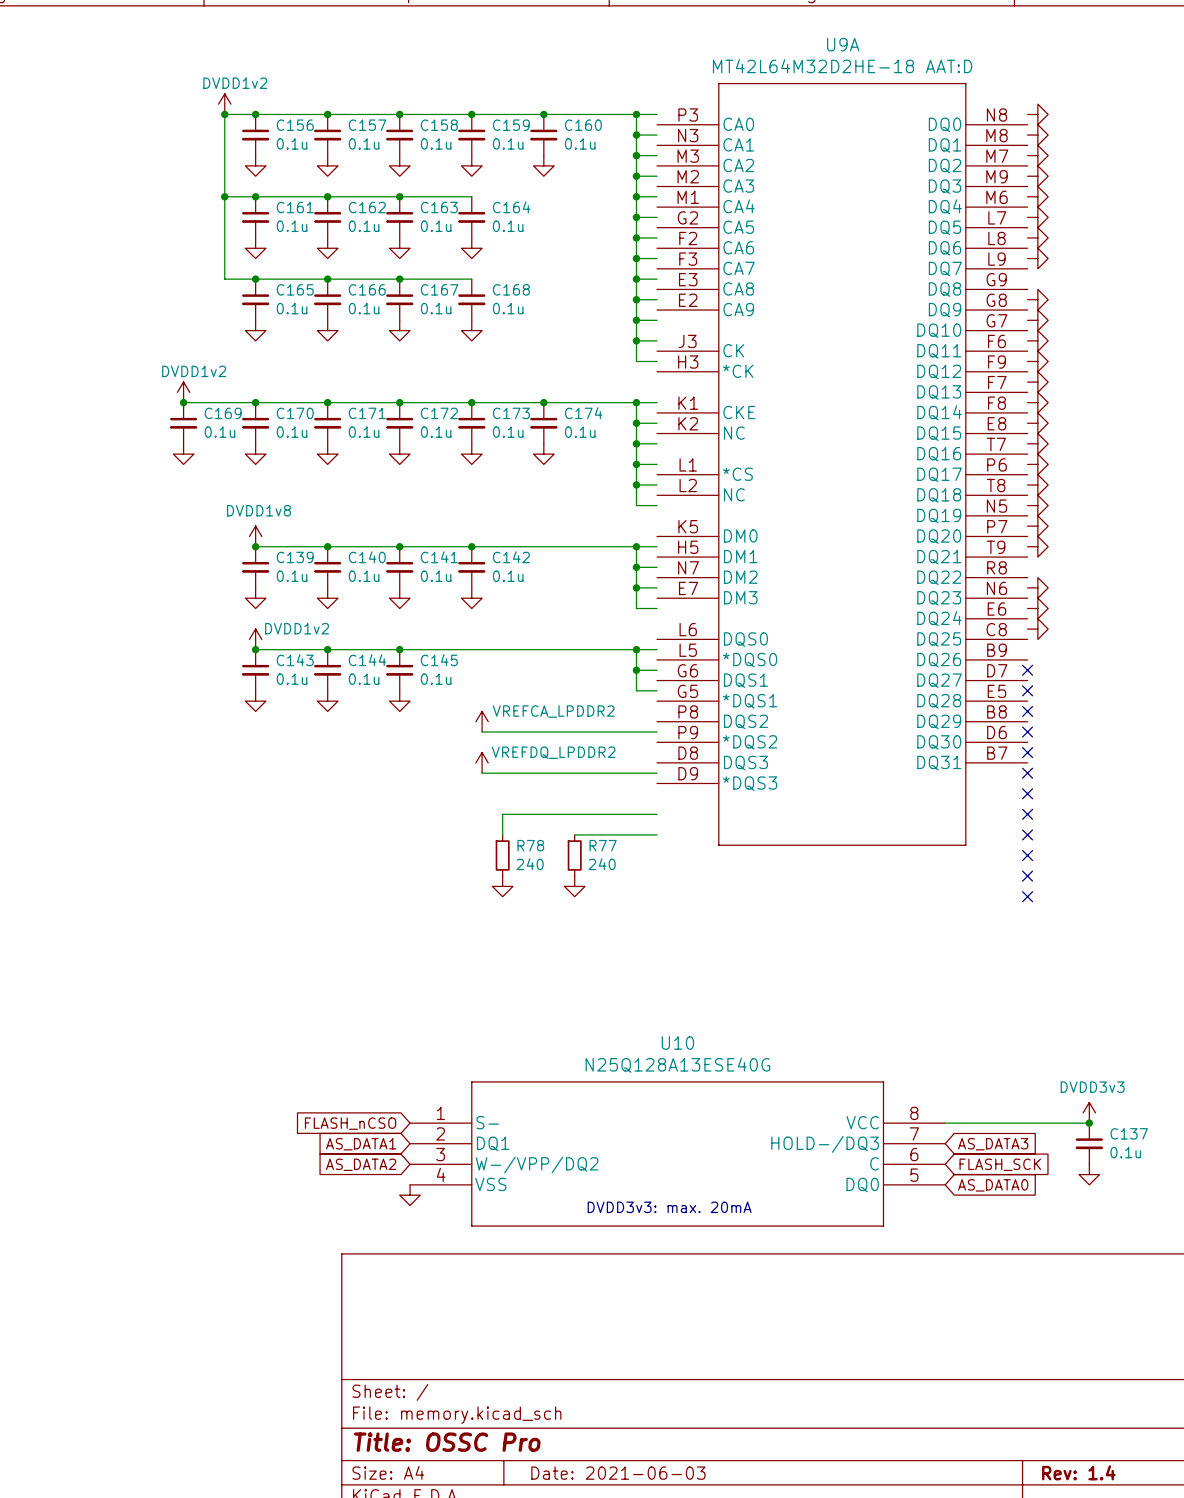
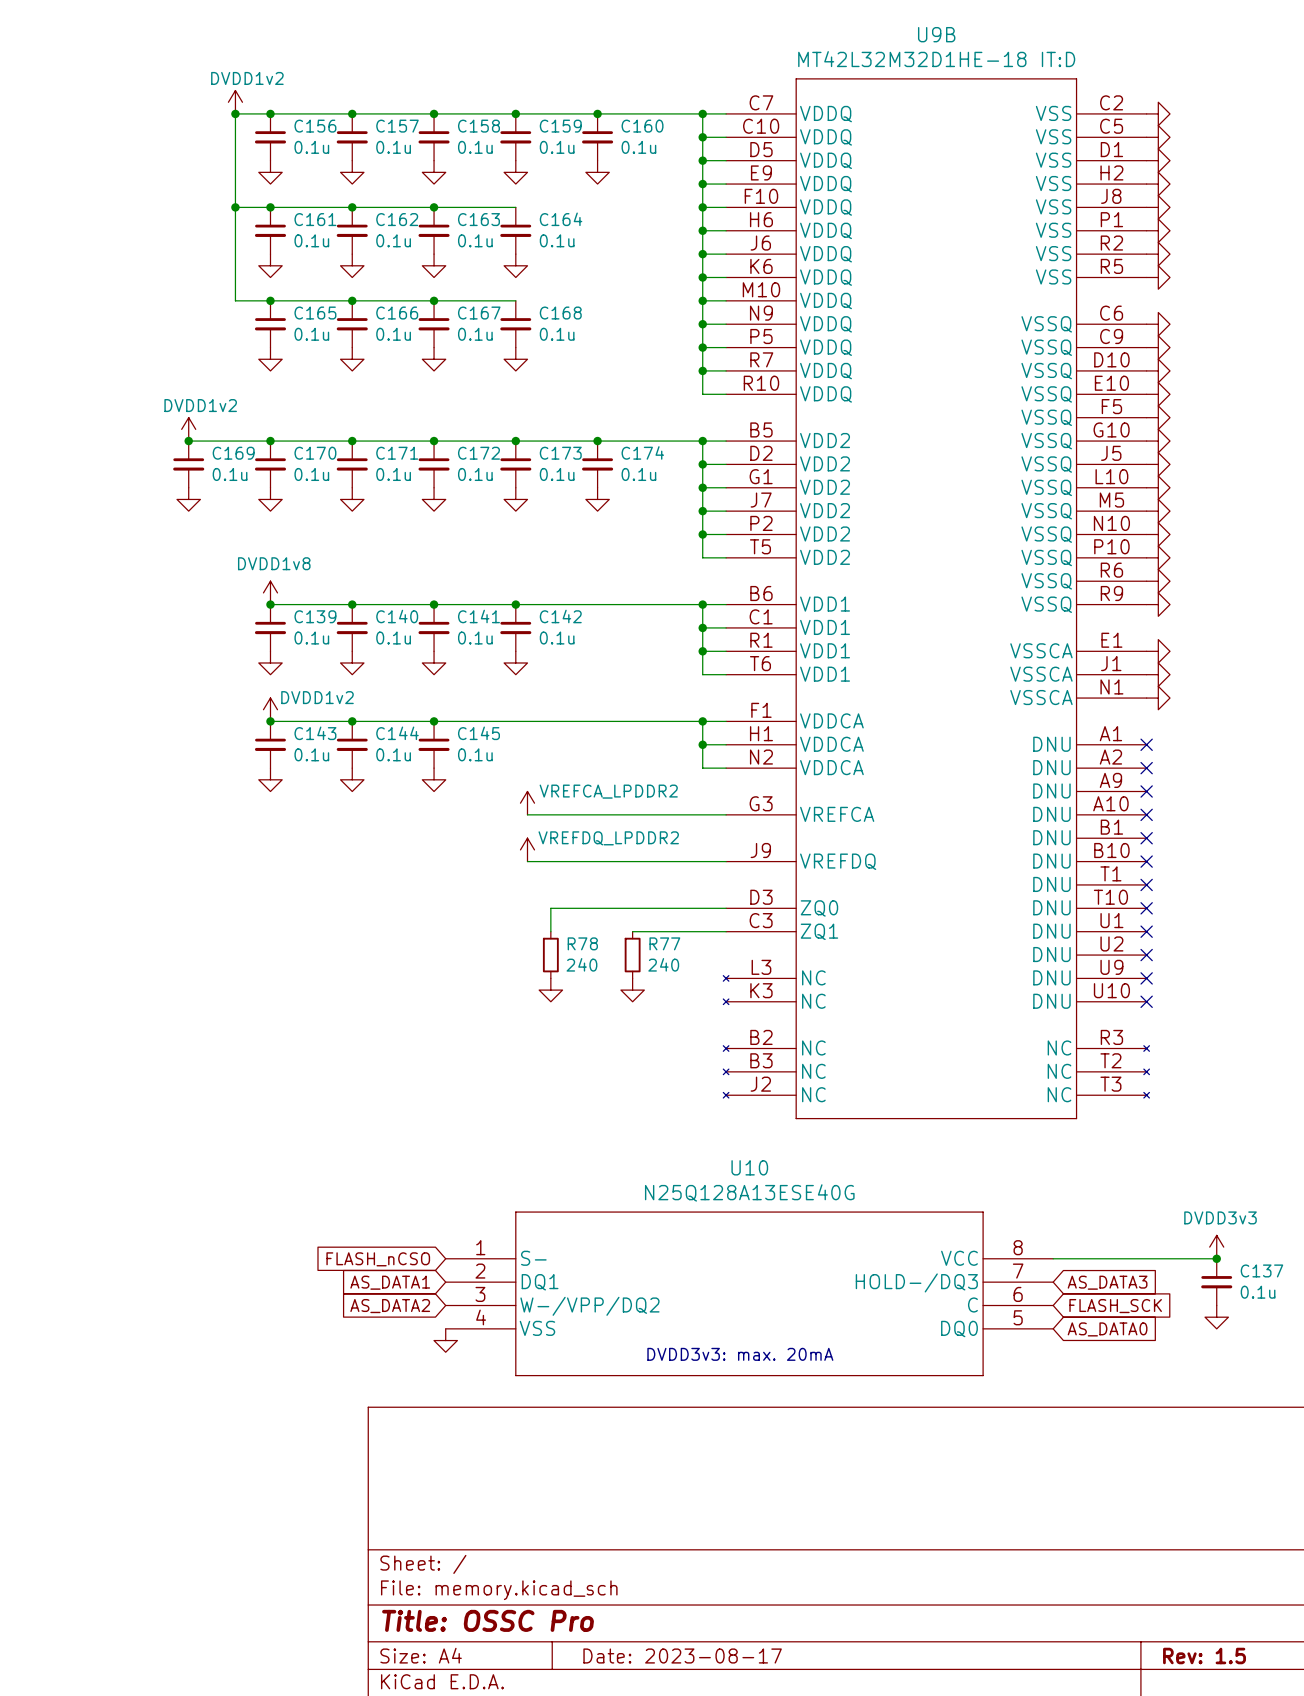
U9A: MT42L64M32D2HE-18 AAT:D (842, 464) -> none
U9B: none -> MT42L32M32D1HE-18 IT:D (936, 598)
title block: Rev: 1.4 (1078, 1472) -> Rev: 1.5 (1204, 1656)
title block: Date: 2021-06-03 (618, 1473) -> Date: 2023-08-17 (682, 1656)

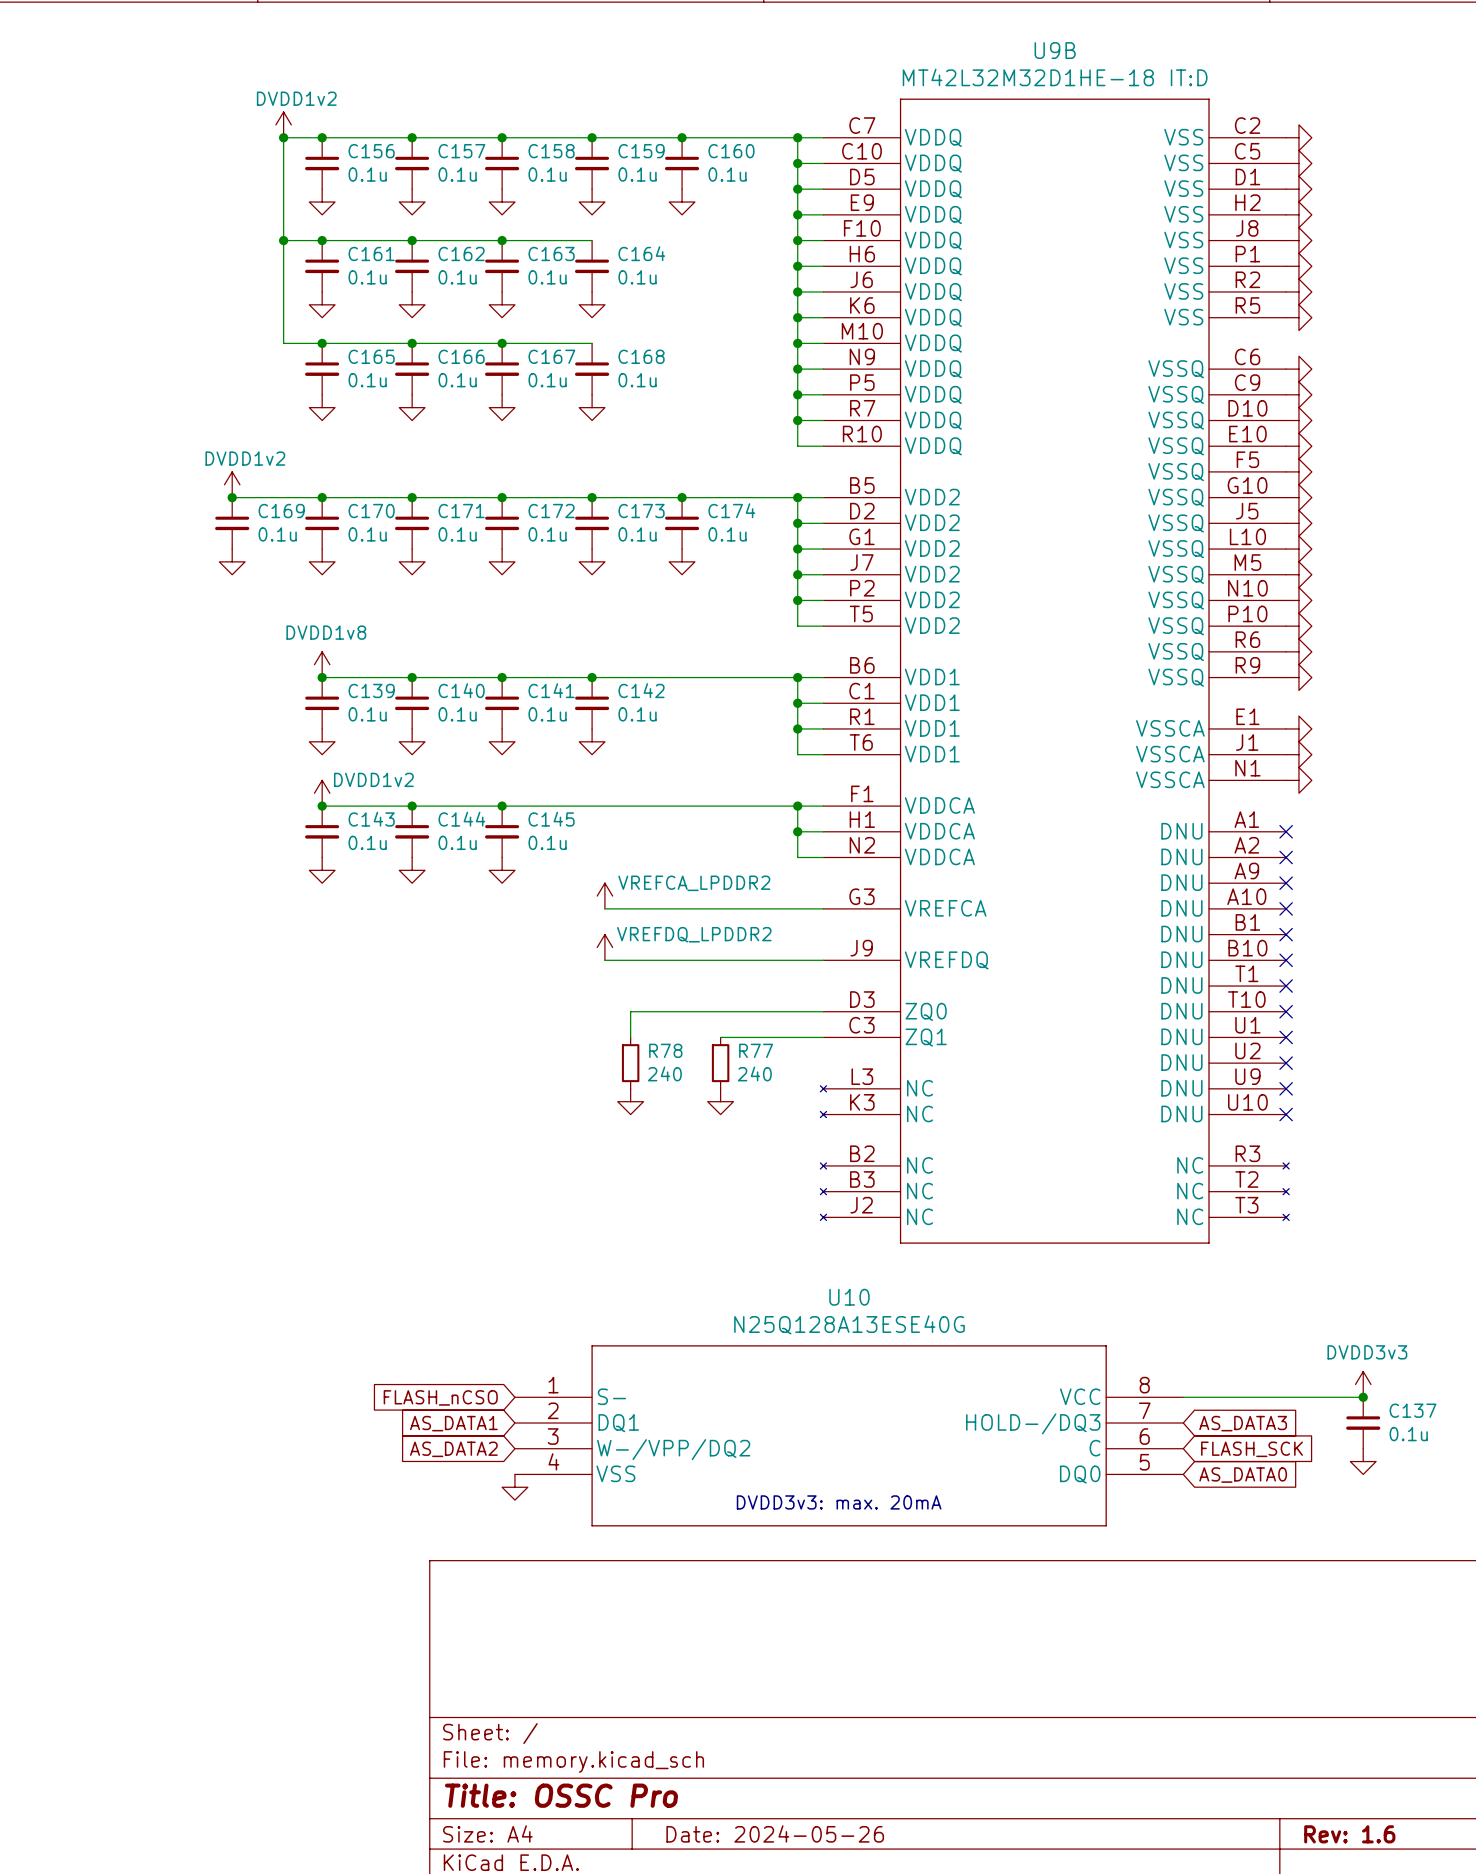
title block: Date: 2023-08-17 (682, 1656) -> Date: 2024-05-26 (775, 1833)
title block: Rev: 1.5 (1204, 1656) -> Rev: 1.6 (1349, 1834)

